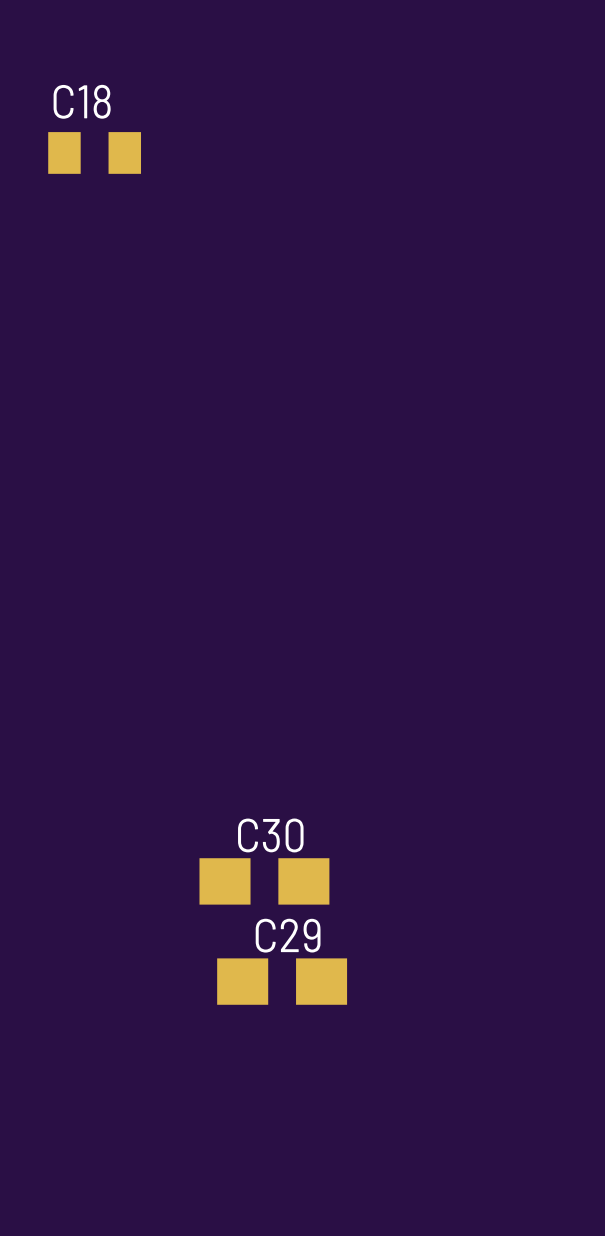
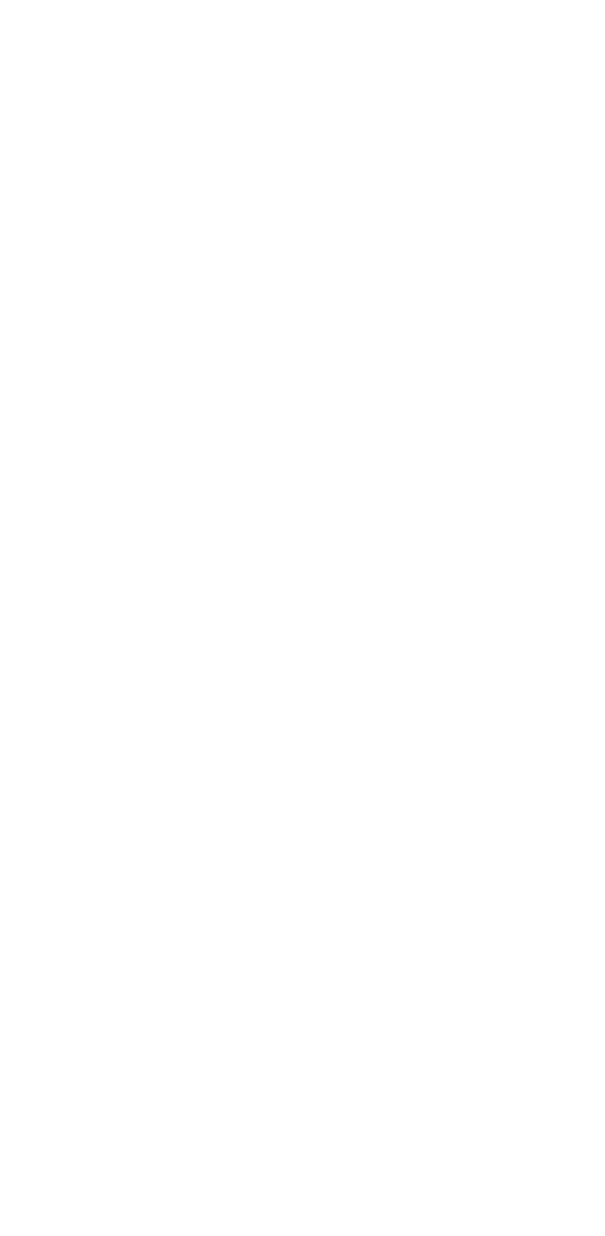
C18: (94, 152) -> none
C30: (264, 881) -> none
C29: (282, 981) -> none

